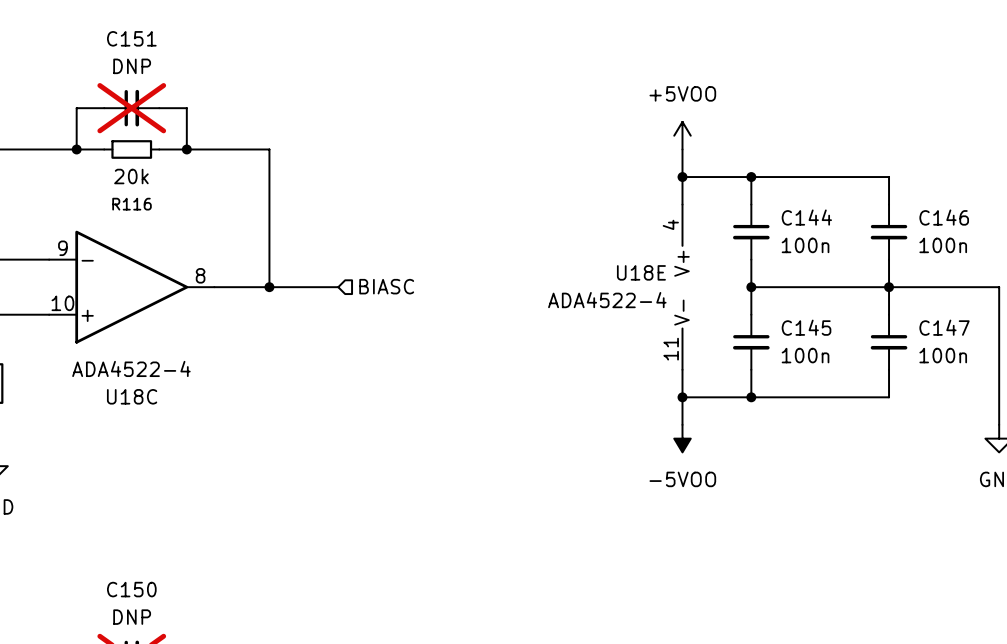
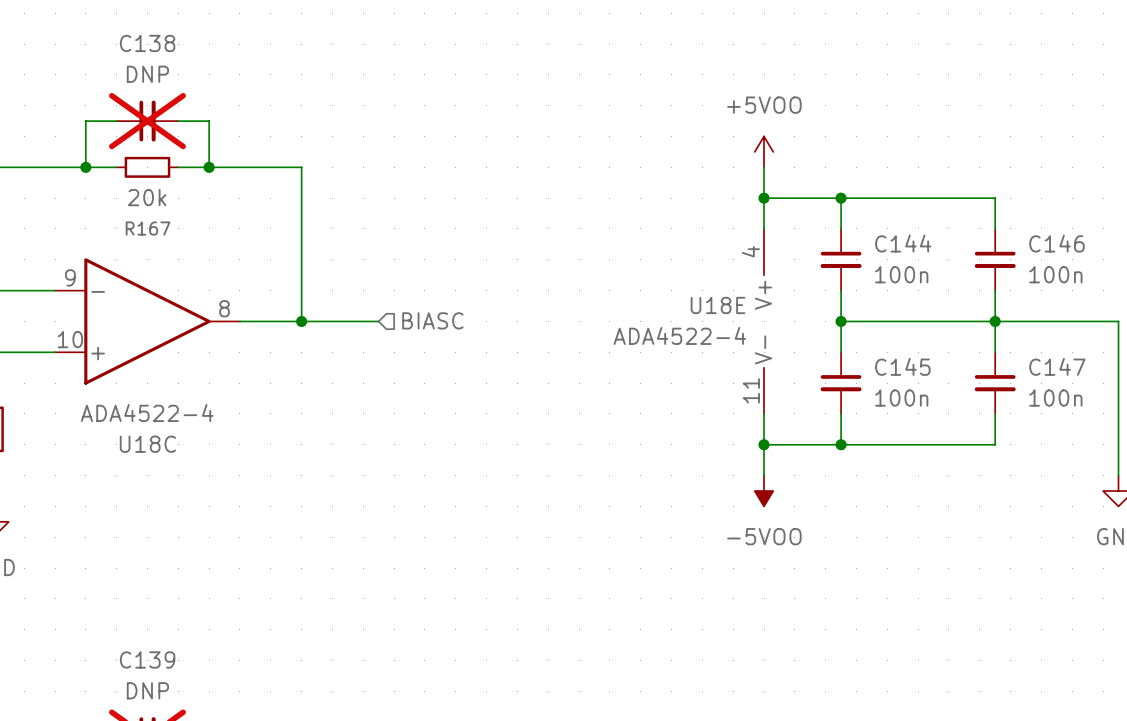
C151 name: C151 (131, 38) -> C138 (147, 43)
R116 name: R116 (132, 204) -> R167 (148, 228)
C150 name: C150 (131, 589) -> C139 (147, 659)

